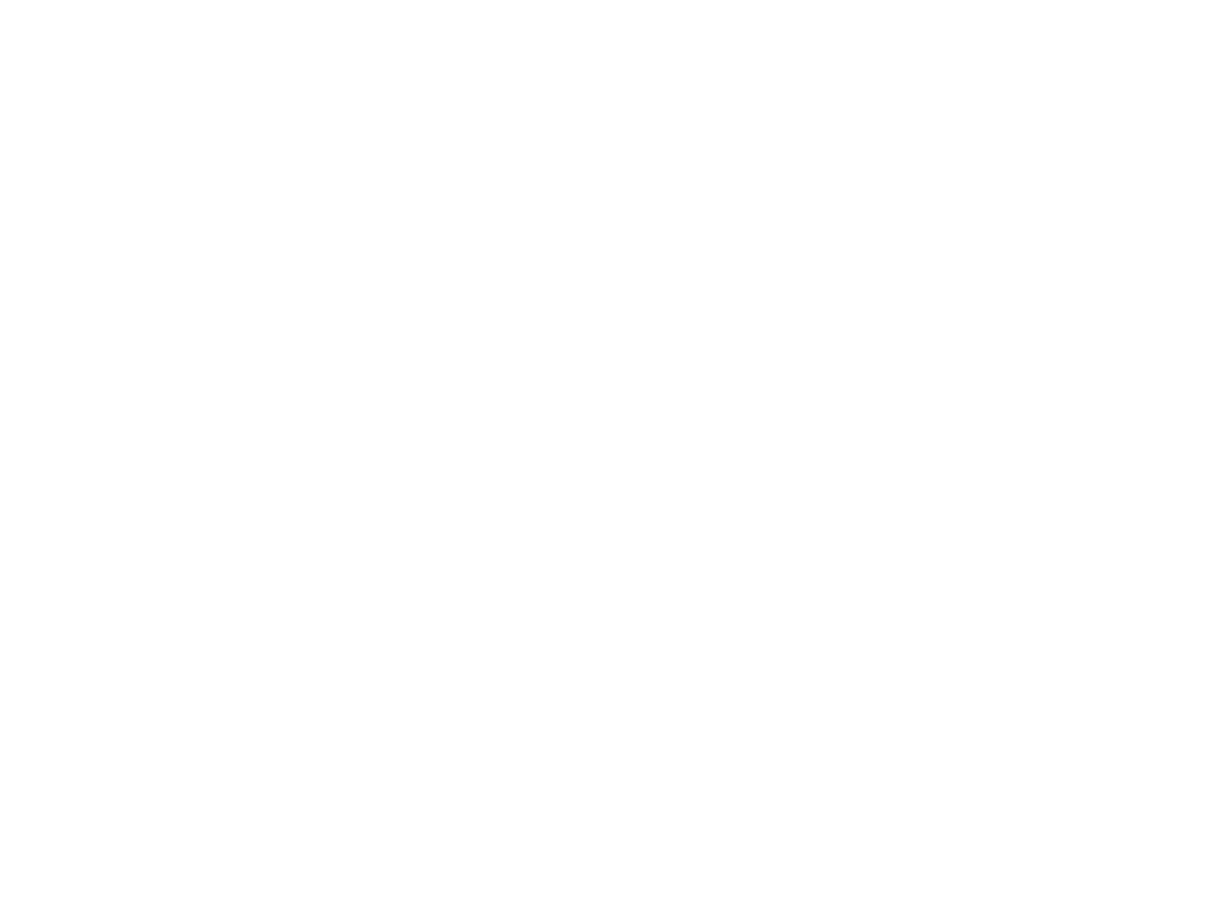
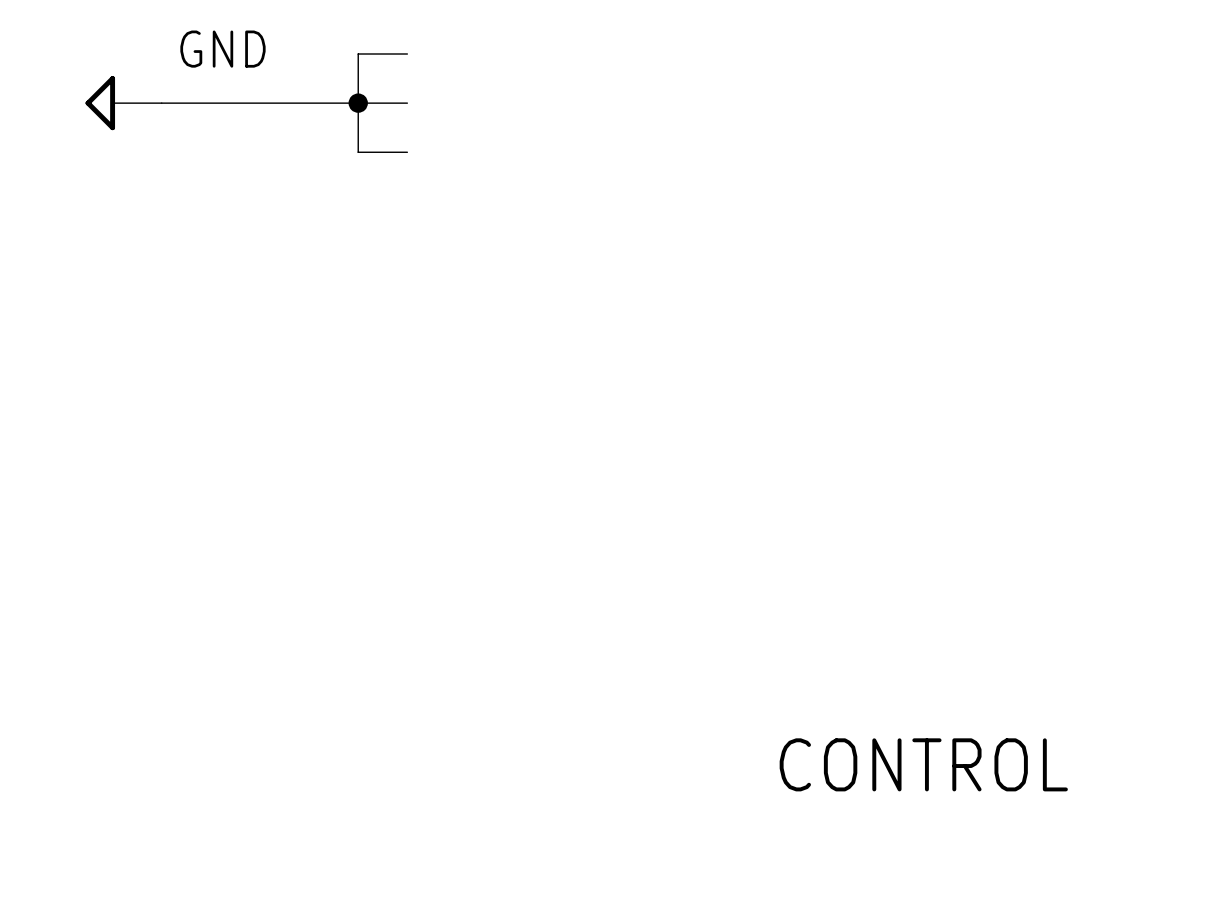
wire: none -> (407, 54) (358, 54) (358, 152) (407, 152)
power symbol: none -> GND (123, 103)
wire: none -> (161, 103) (407, 103)
junction: none -> (358, 103)
text: none -> CONTROL (923, 764)

